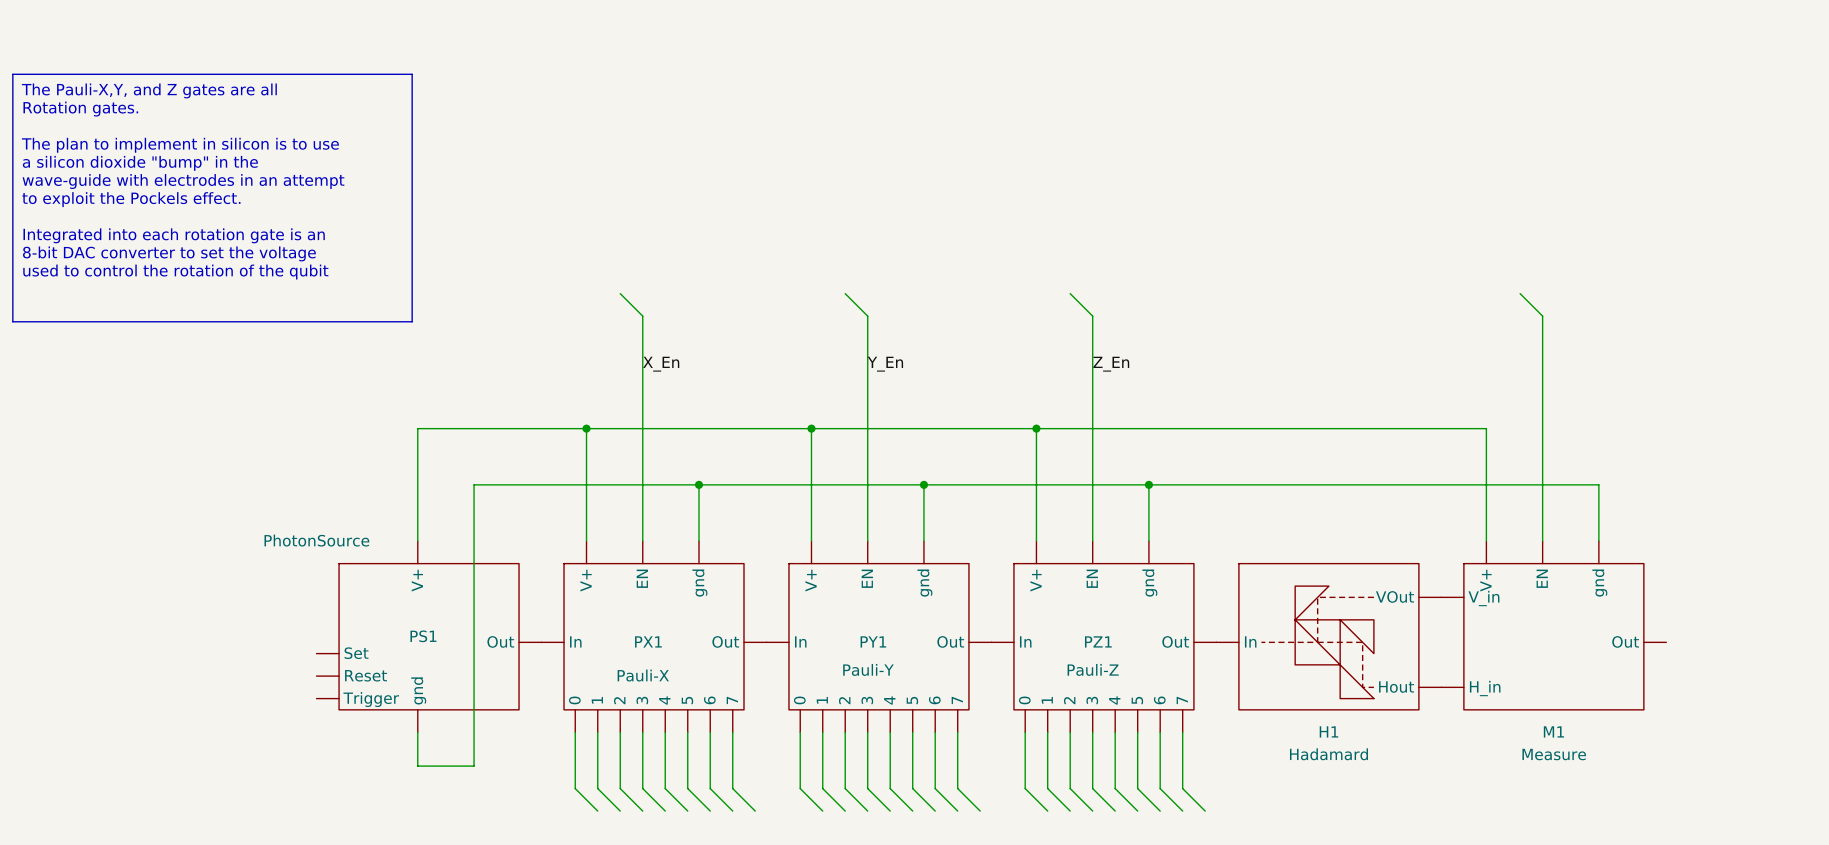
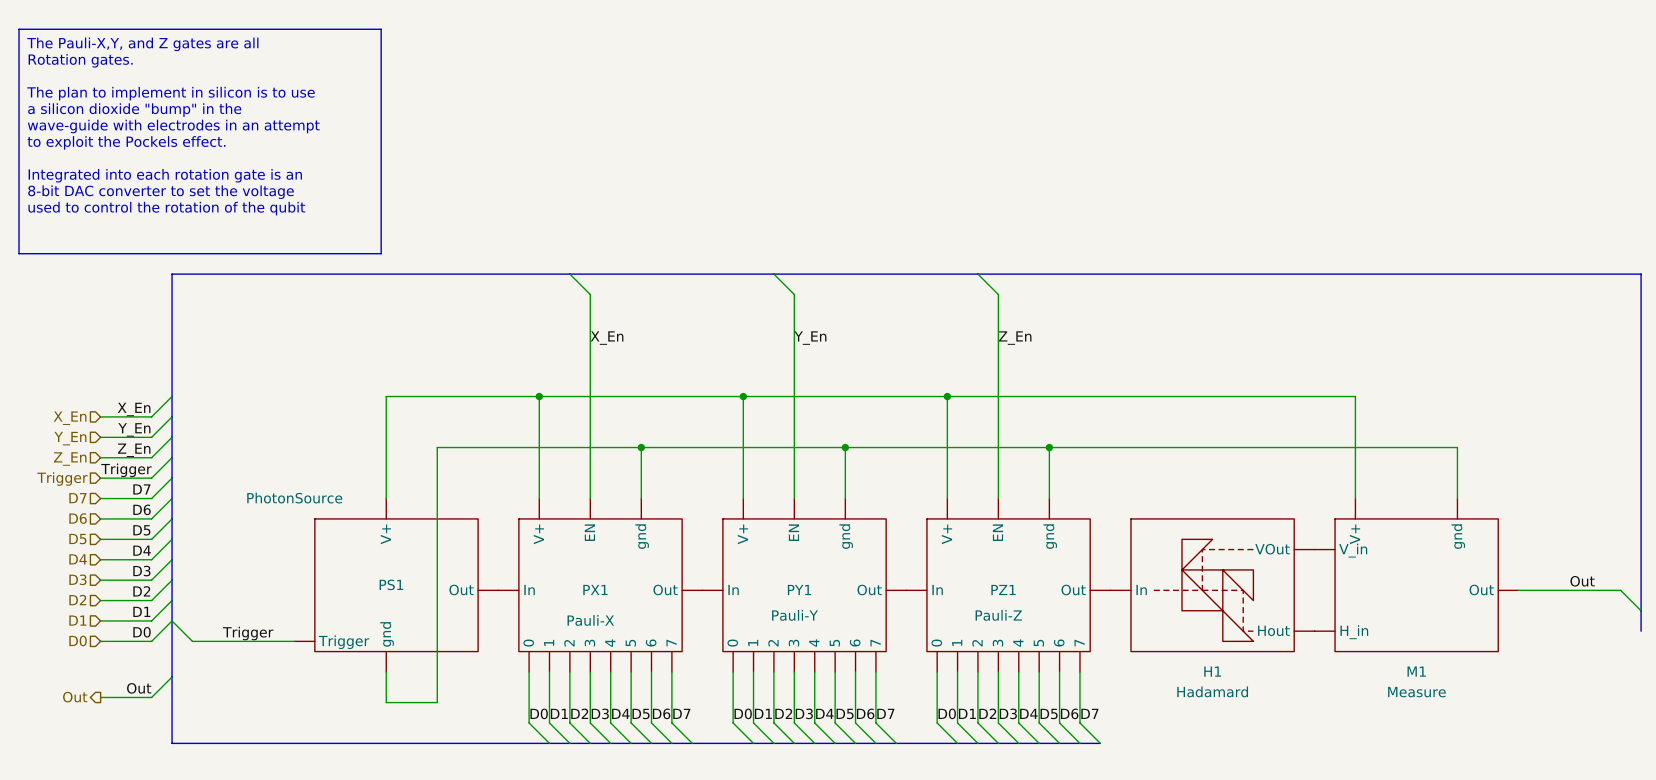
line: (12, 74) (412, 74) -> (19, 75) (19, 29) (381, 29) (381, 75)
text position: The Pauli-X,Y, and Z gates are all (149, 90) -> The Pauli-X,Y, and Z gates are all (142, 44)
text position: Rotation gates. (80, 109) -> Rotation gates. (80, 60)
text position: The plan to implement in silicon is to use (180, 145) -> The plan to implement in silicon is to use (170, 93)
text position: a silicon dioxide "bump" in the (140, 163) -> a silicon dioxide "bump" in the (134, 110)
text position: wave-guide with electrodes in an attempt (183, 181) -> wave-guide with electrodes in an attempt (173, 126)
text position: to exploit the Pockels effect. (131, 199) -> to exploit the Pockels effect. (126, 142)
text position: Integrated into each rotation gate is an (174, 235) -> Integrated into each rotation gate is an (165, 175)
text position: 8-bit DAC converter to set the voltage (169, 253) -> 8-bit DAC converter to set the voltage (161, 192)
line: (12, 271) (12, 321) (412, 321) (412, 271) -> (19, 253) (381, 253)
text position: used to control the rotation of the qubit (175, 272) -> used to control the rotation of the qubit (166, 208)
wire: (1520, 293) (1542, 316) (1542, 541) -> none
wire: none -> (172, 396) (151, 416) (100, 416)
label: none -> X_En (134, 409)
wire: none -> (172, 416) (151, 437) (100, 437)
hierarchical label: none -> X_En (70, 418)
label: none -> Y_En (134, 429)
wire: none -> (172, 437) (151, 457) (100, 457)
hierarchical label: none -> Y_En (70, 438)
label: none -> Z_En (134, 450)
wire: none -> (172, 457) (151, 478) (100, 478)
hierarchical label: none -> Z_En (70, 459)
label: none -> Trigger (126, 470)
wire: none -> (172, 478) (151, 498) (100, 498)
hierarchical label: none -> Trigger (62, 479)
label: none -> D7 (141, 489)
hierarchical label: none -> D7 (77, 498)
wire: none -> (172, 498) (151, 518) (100, 518)
PS1 symbol: [316, 541, 542, 733] -> [294, 498, 499, 672]
M1 symbol: [1441, 541, 1667, 710] -> [1314, 498, 1519, 652]
label: none -> D6 (142, 509)
hierarchical label: none -> D6 (78, 518)
wire: none -> (172, 518) (151, 539) (100, 539)
label: none -> D5 (141, 530)
hierarchical label: none -> D5 (77, 539)
wire: none -> (172, 539) (151, 559) (100, 559)
label: none -> D4 (142, 550)
hierarchical label: none -> D4 (78, 559)
wire: none -> (172, 559) (151, 580) (100, 580)
label: none -> D3 (141, 571)
hierarchical label: none -> D3 (77, 579)
wire: none -> (172, 580) (151, 600) (100, 600)
label: none -> Out (1582, 581)
wire: none -> (1518, 590) (1620, 590) (1641, 610)
label: none -> D2 (141, 591)
hierarchical label: none -> D2 (77, 600)
wire: none -> (172, 600) (151, 620) (100, 620)
label: none -> D1 (141, 611)
hierarchical label: none -> D1 (77, 620)
bus: none -> (1641, 631) (1641, 274) (172, 274) (172, 743) (1100, 743)
label: none -> D0 (142, 632)
label: none -> Trigger (248, 633)
hierarchical label: none -> D0 (78, 640)
wire: none -> (100, 641) (151, 641) (172, 620) (192, 641) (294, 641)
wire: none -> (172, 677) (151, 697) (100, 697)
label: none -> Out (139, 688)
hierarchical label: none -> Out (75, 697)
label: none -> D0 (539, 713)
label: none -> D1 (559, 713)
label: none -> D2 (579, 713)
label: none -> D3 (600, 713)
label: none -> D4 (620, 713)
label: none -> D5 (641, 713)
label: none -> D6 (661, 713)
label: none -> D7 (681, 713)
label: none -> D0 (743, 713)
label: none -> D1 (763, 713)
label: none -> D2 (783, 713)
label: none -> D3 (804, 713)
label: none -> D4 (824, 713)
label: none -> D5 (845, 713)
label: none -> D6 (865, 713)
label: none -> D7 (885, 713)
label: none -> D0 (947, 713)
label: none -> D1 (967, 713)
label: none -> D2 (987, 713)
label: none -> D3 (1008, 713)
label: none -> D4 (1028, 713)
label: none -> D5 (1049, 713)
label: none -> D6 (1069, 713)
label: none -> D7 (1089, 713)

